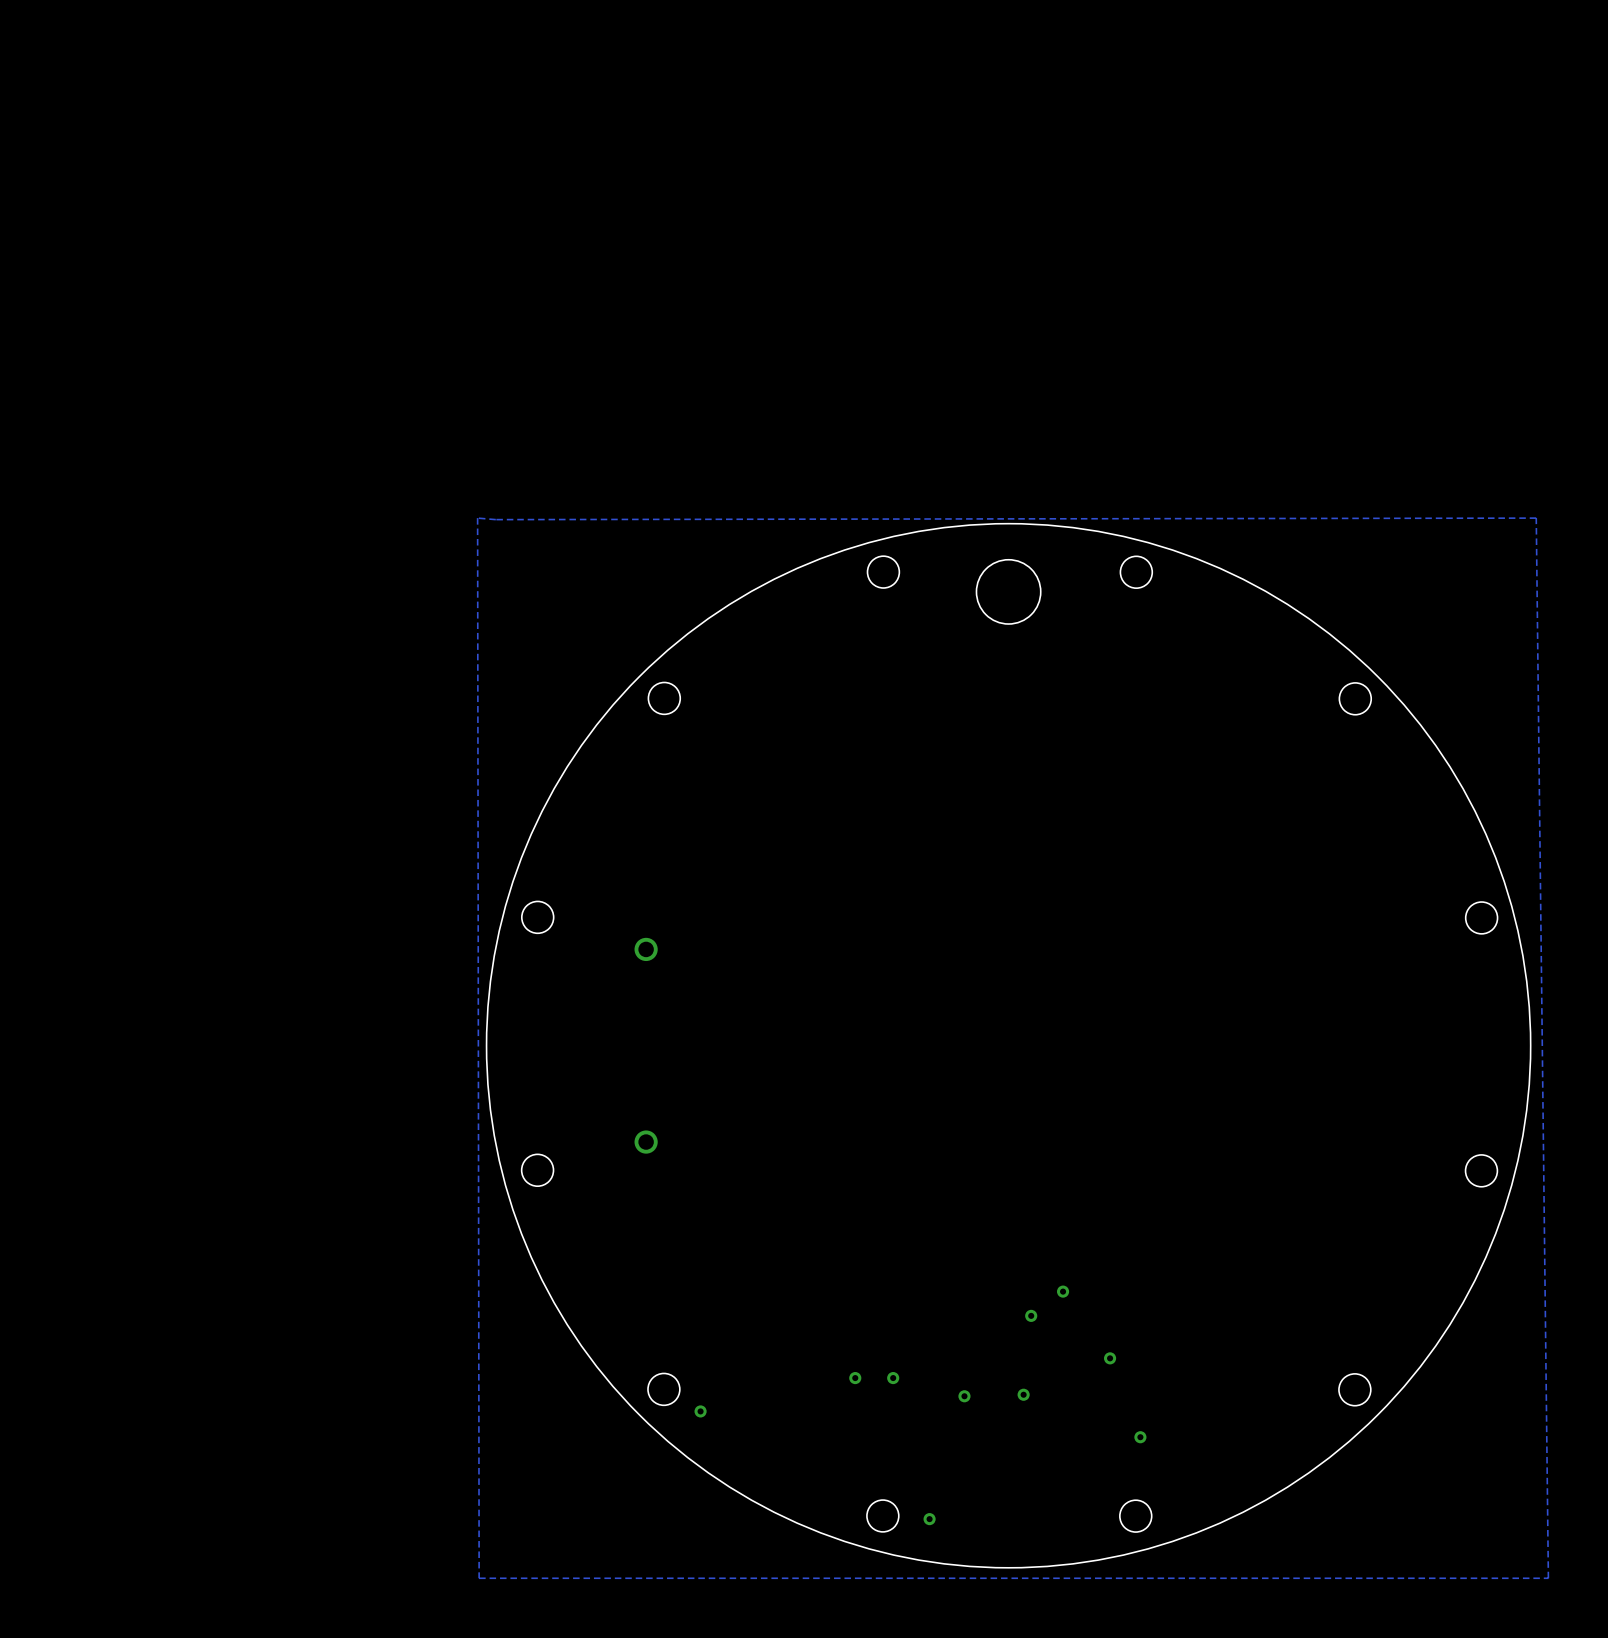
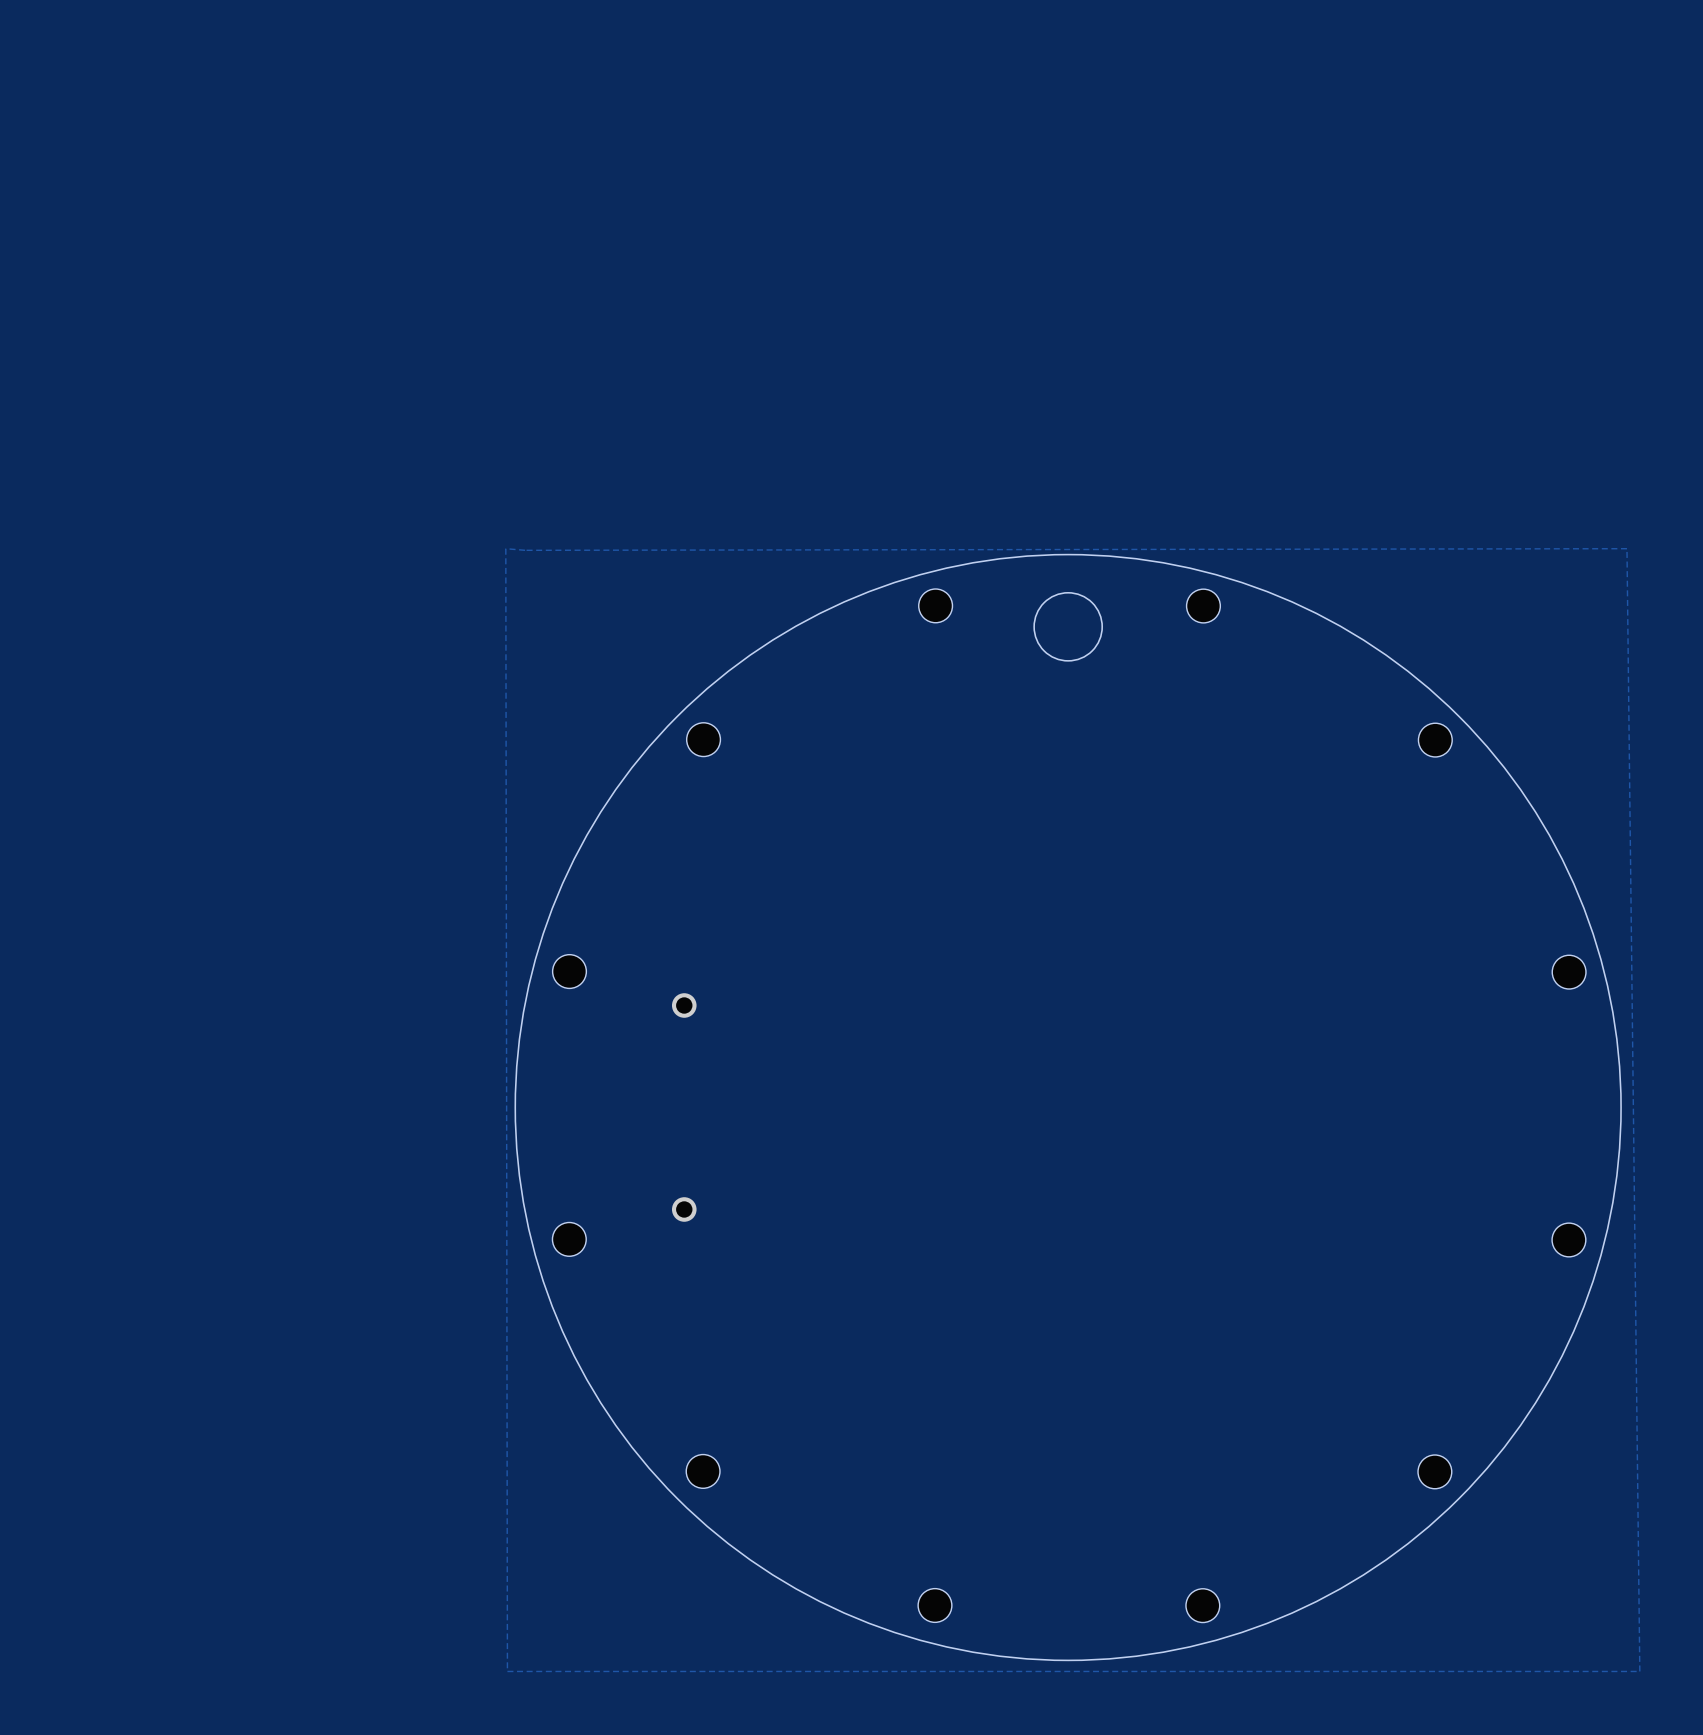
via: (1063, 1291) -> none
via: (1031, 1315) -> none
via: (1110, 1358) -> none
via: (855, 1378) -> none
via: (893, 1378) -> none
via: (1023, 1394) -> none
via: (964, 1396) -> none
via: (700, 1411) -> none
via: (1140, 1437) -> none
via: (929, 1519) -> none

